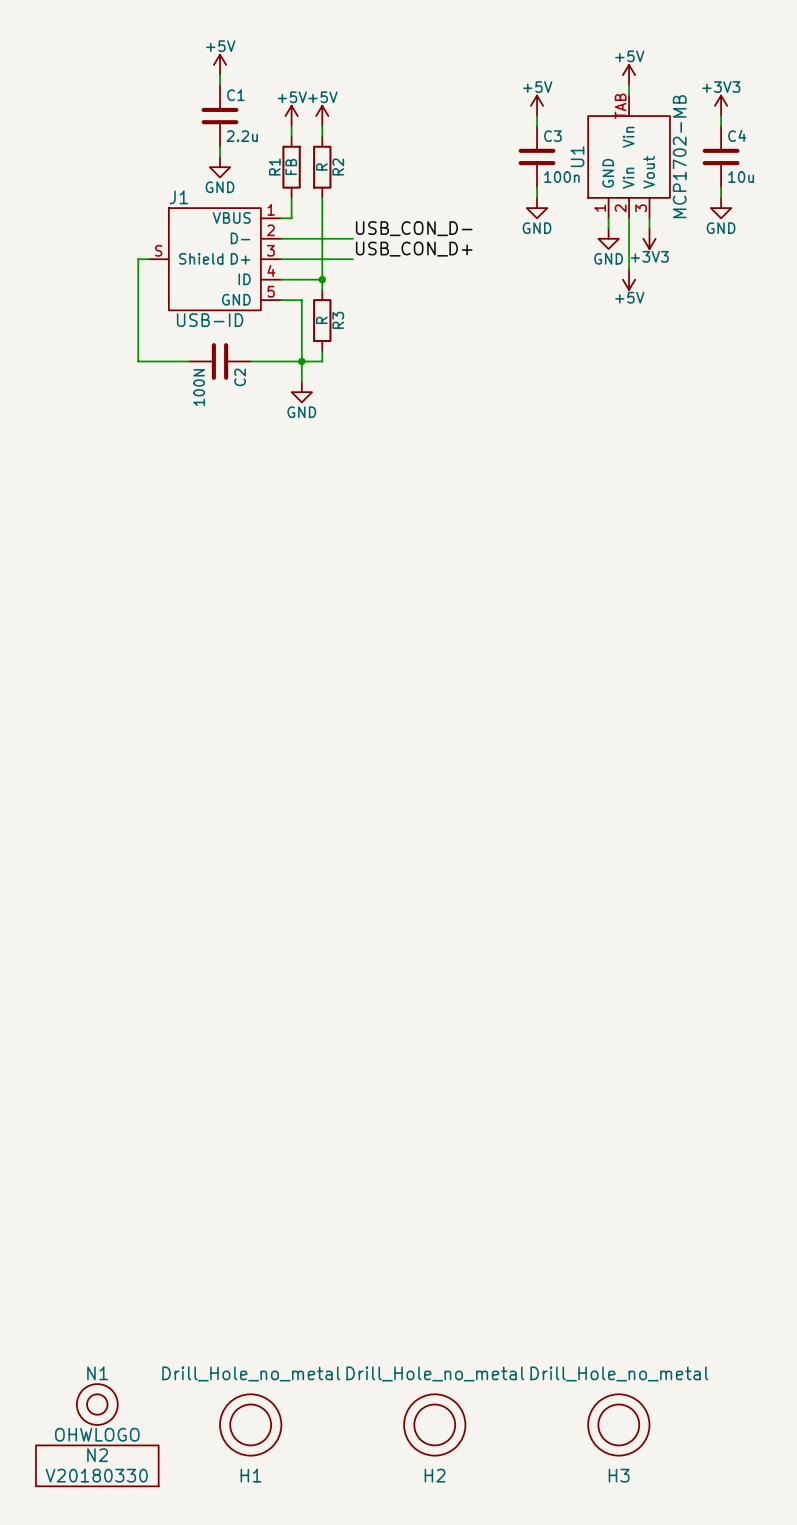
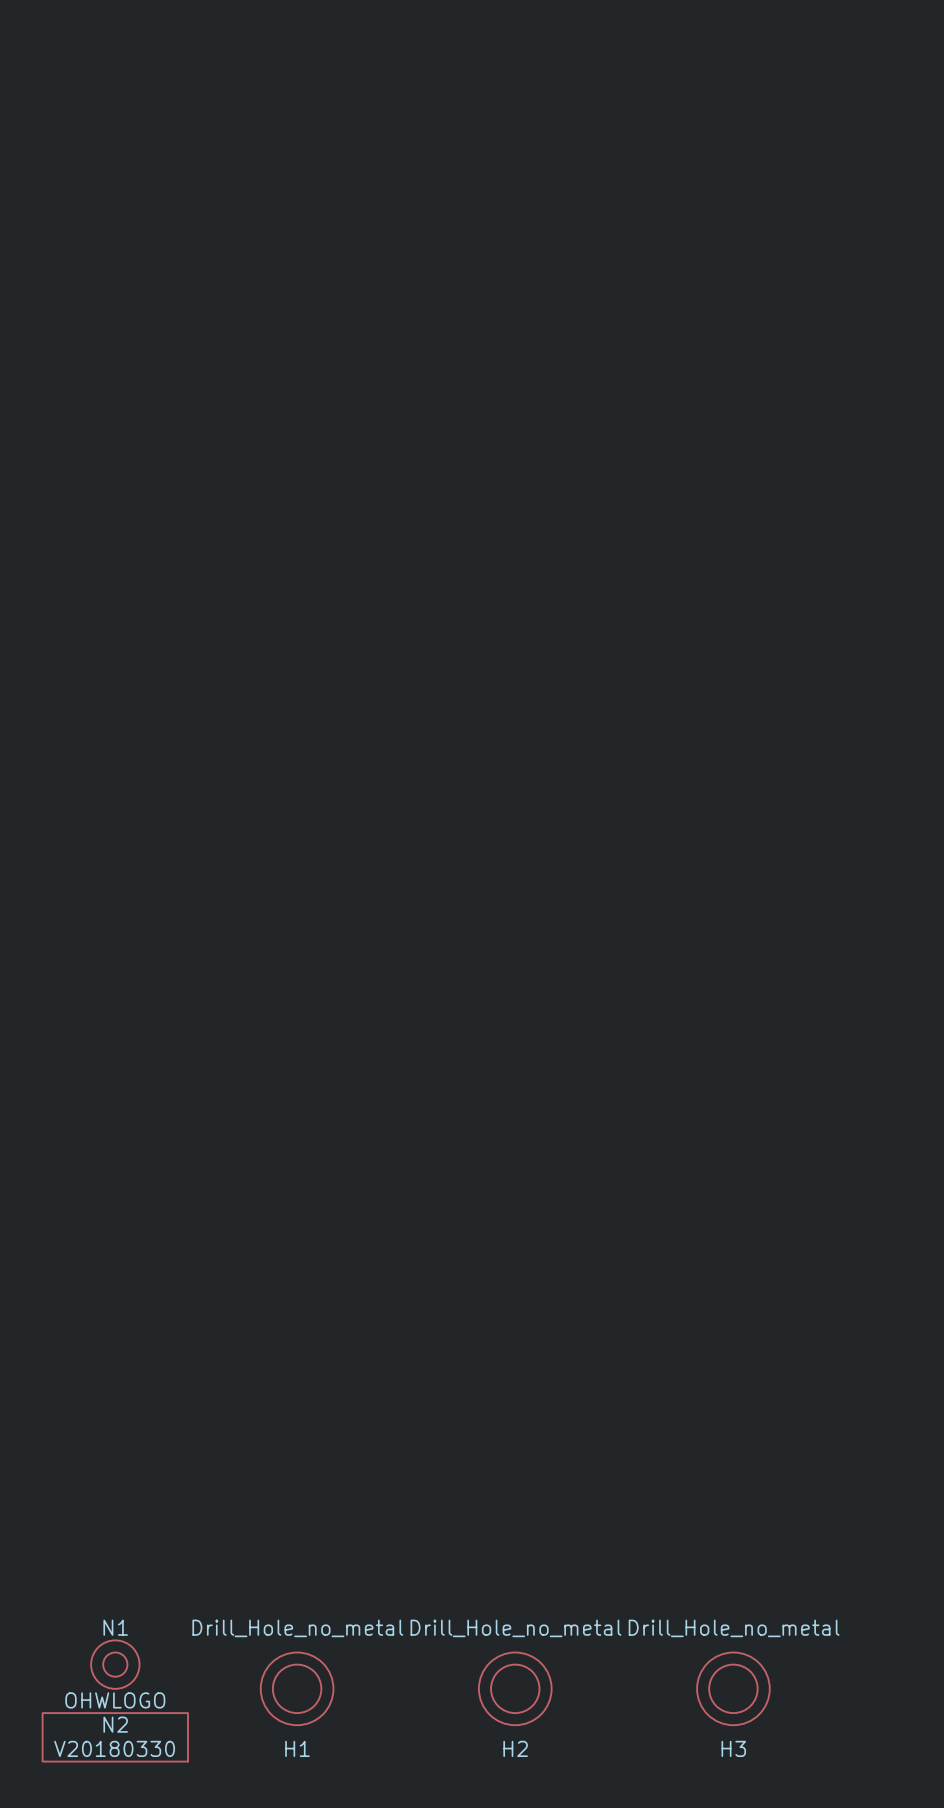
power symbol: +5V (220, 64) -> none
wire: (220, 75) (220, 85) -> none
power symbol: +5V (629, 75) -> none
wire: (629, 85) (629, 95) -> none
power symbol: +5V (537, 105) -> none
power symbol: +3V3 (721, 105) -> none
C1: 2.2u (220, 116) -> none
power symbol: +5V (291, 116) -> none
power symbol: +5V (322, 116) -> none
wire: (537, 116) (537, 126) -> none
wire: (721, 116) (721, 126) -> none
wire: (291, 126) (291, 136) -> none
wire: (322, 126) (322, 136) -> none
wire: (220, 146) (220, 156) -> none
C3: 100n (537, 156) -> none
U1: MCP1702-MB (629, 156) -> none
C4: 10u (721, 156) -> none
power symbol: GND (220, 167) -> none
R1: FB (291, 167) -> none
R2: R (322, 167) -> none
wire: (537, 187) (537, 197) -> none
wire: (721, 187) (721, 197) -> none
wire: (291, 197) (291, 218) (281, 218) -> none
wire: (322, 197) (322, 289) -> none
power symbol: GND (537, 208) -> none
power symbol: GND (721, 208) -> none
wire: (608, 218) (608, 228) -> none
wire: (629, 218) (629, 269) -> none
wire: (649, 218) (649, 228) -> none
label: USB_CON_D- (414, 228) -> none
wire: (281, 238) (352, 238) -> none
power symbol: GND (608, 238) -> none
power symbol: +3V3 (649, 238) -> none
label: USB_CON_D+ (414, 249) -> none
wire: (148, 259) (138, 259) (138, 361) (189, 361) -> none
J1: USB-ID (214, 259) -> none
wire: (281, 259) (352, 259) -> none
wire: (281, 279) (322, 279) -> none
junction: (322, 279) -> none
power symbol: +5V (629, 279) -> none
wire: (281, 300) (301, 300) (301, 381) -> none
R3: R (322, 320) -> none
wire: (322, 351) (322, 361) (250, 361) -> none
C2: 100N (220, 361) -> none
junction: (301, 361) -> none
power symbol: GND (301, 392) -> none

